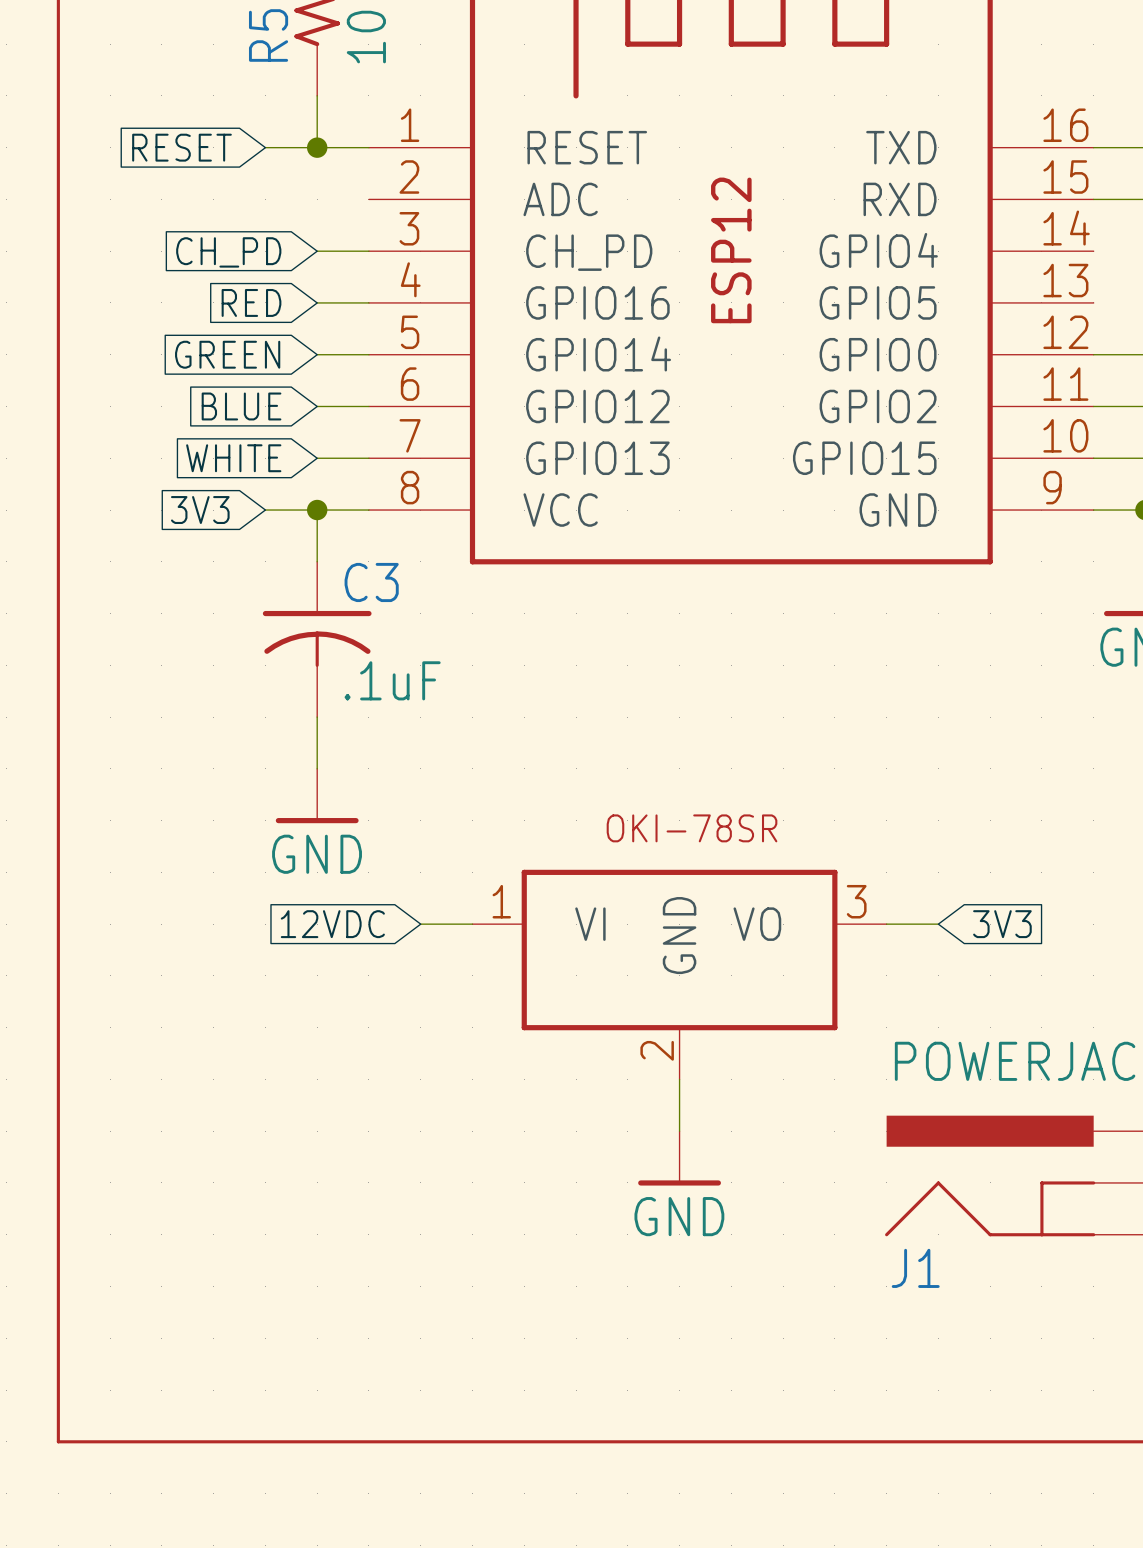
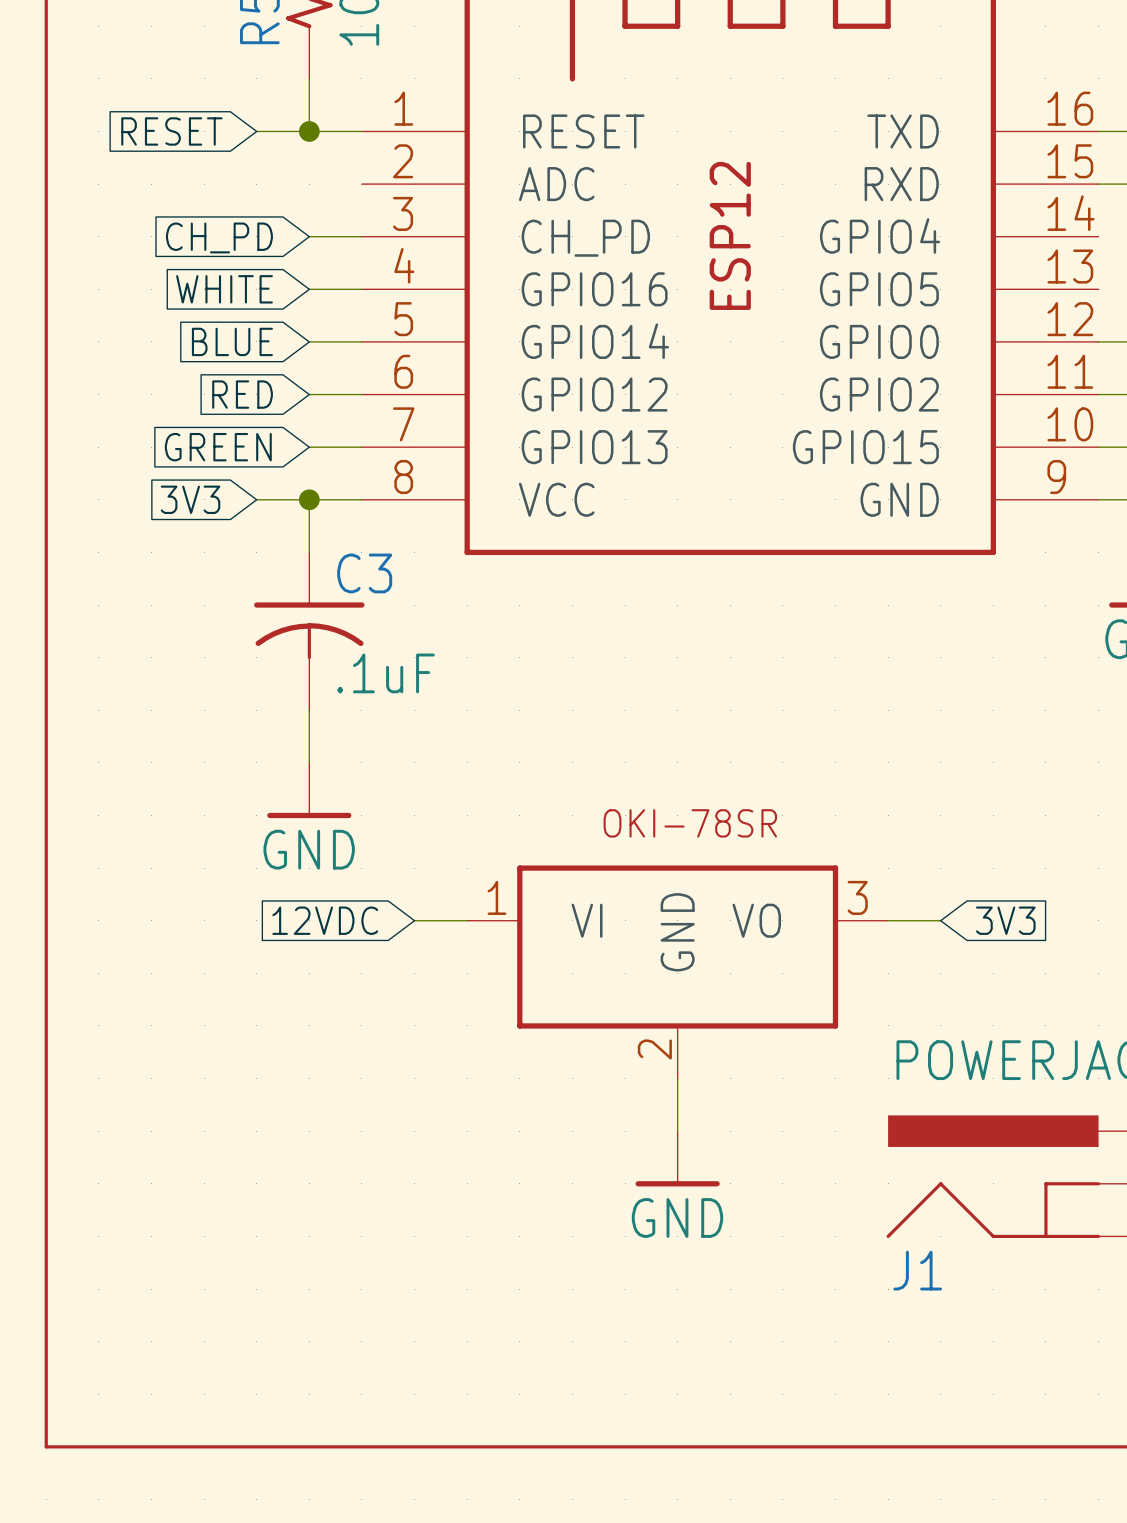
global label: RED (251, 302) -> WHITE (224, 289)
global label: GREEN (227, 354) -> BLUE (232, 341)
global label: BLUE (241, 406) -> RED (242, 394)
global label: WHITE (233, 458) -> GREEN (218, 447)

